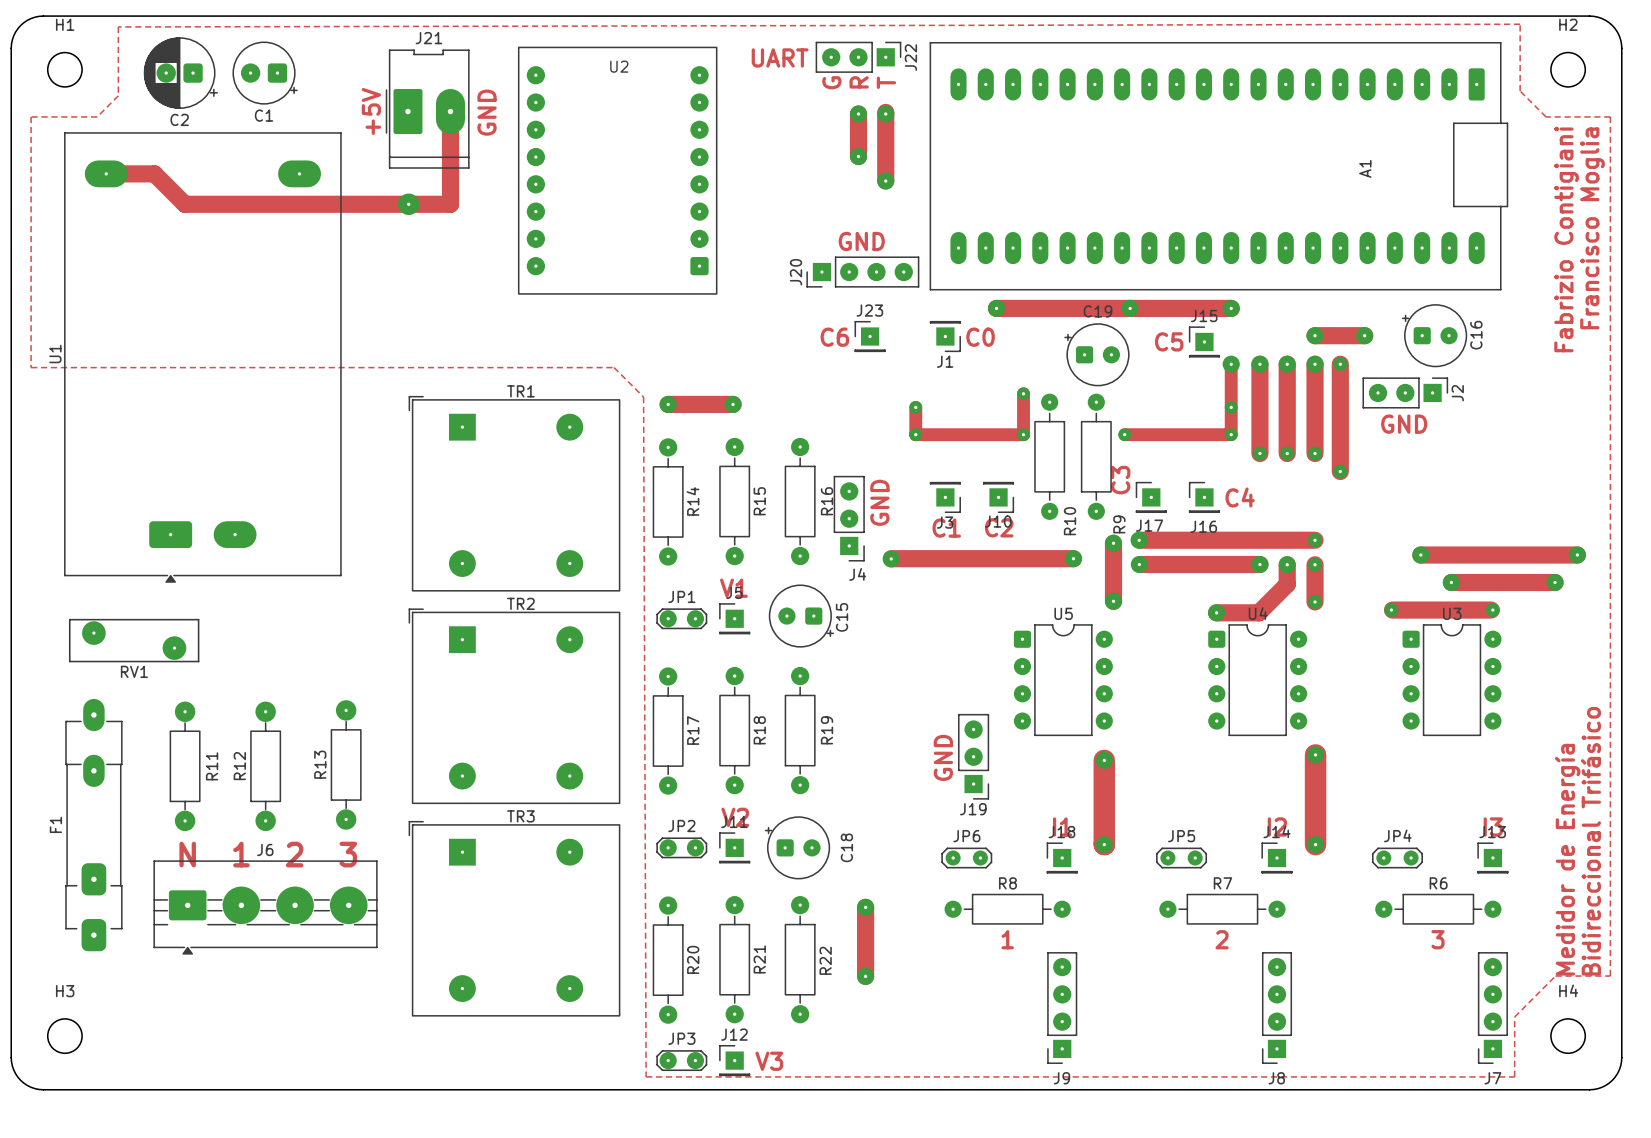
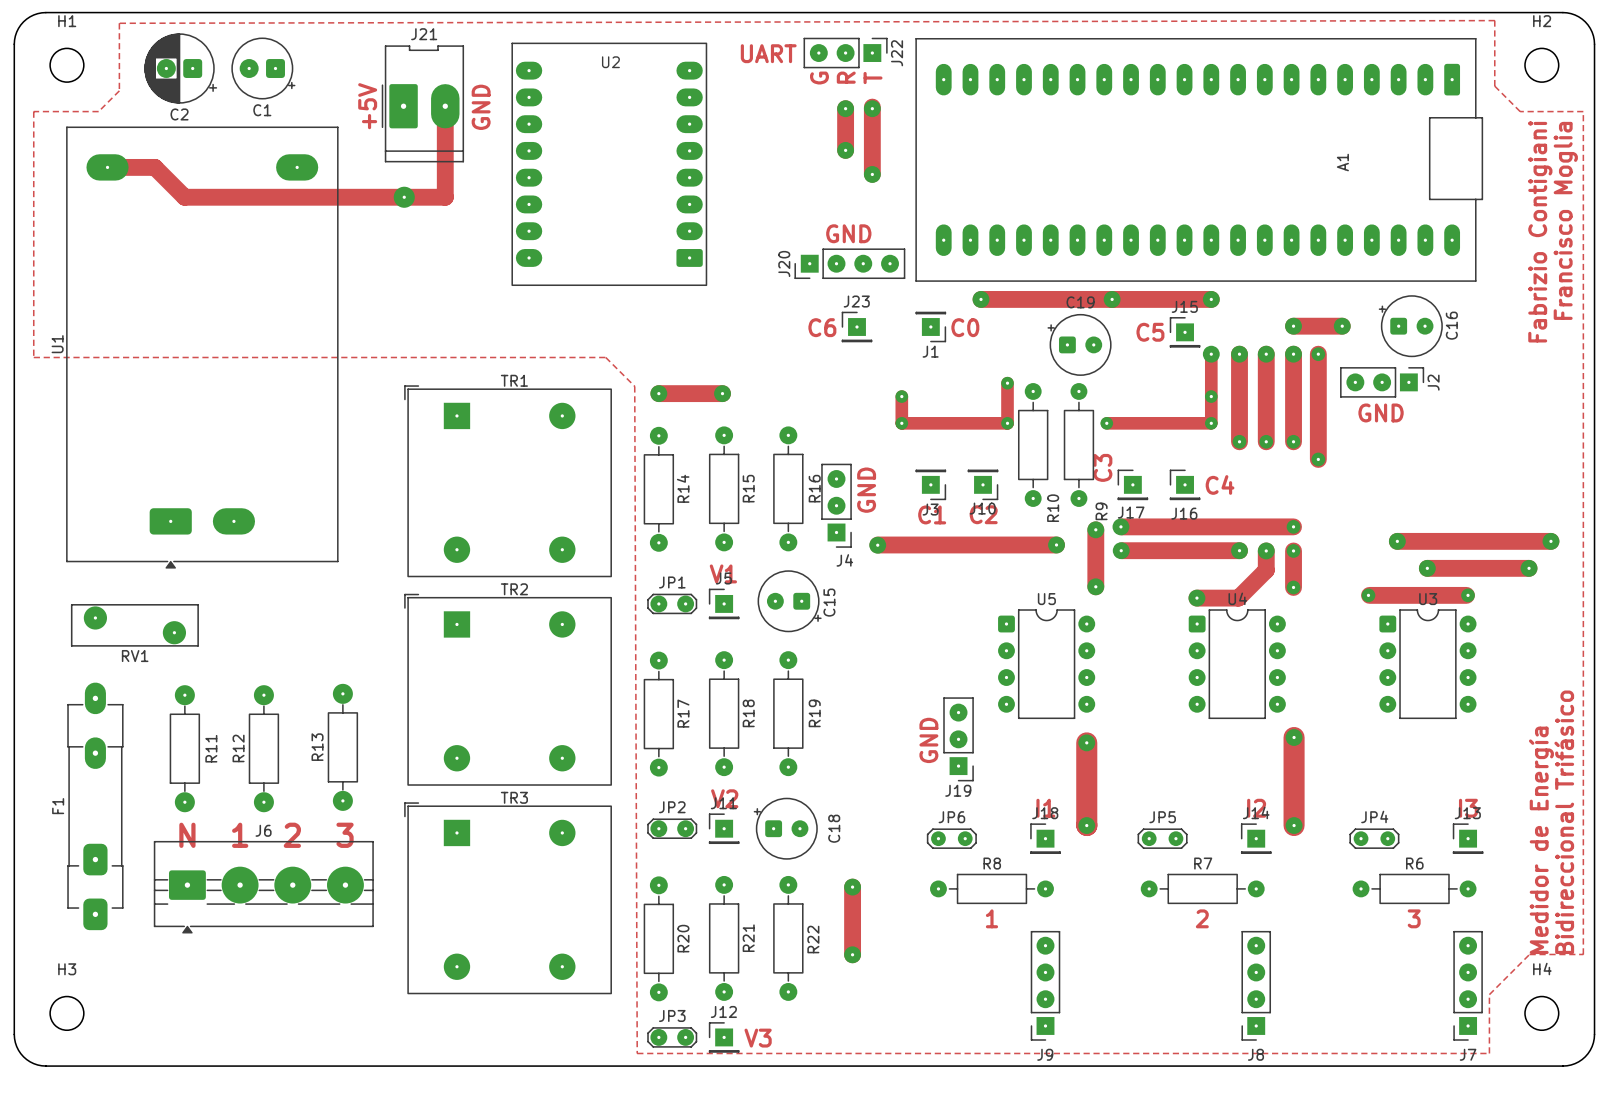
U2 footprint: [518, 46, 718, 295] -> [511, 42, 708, 286]

